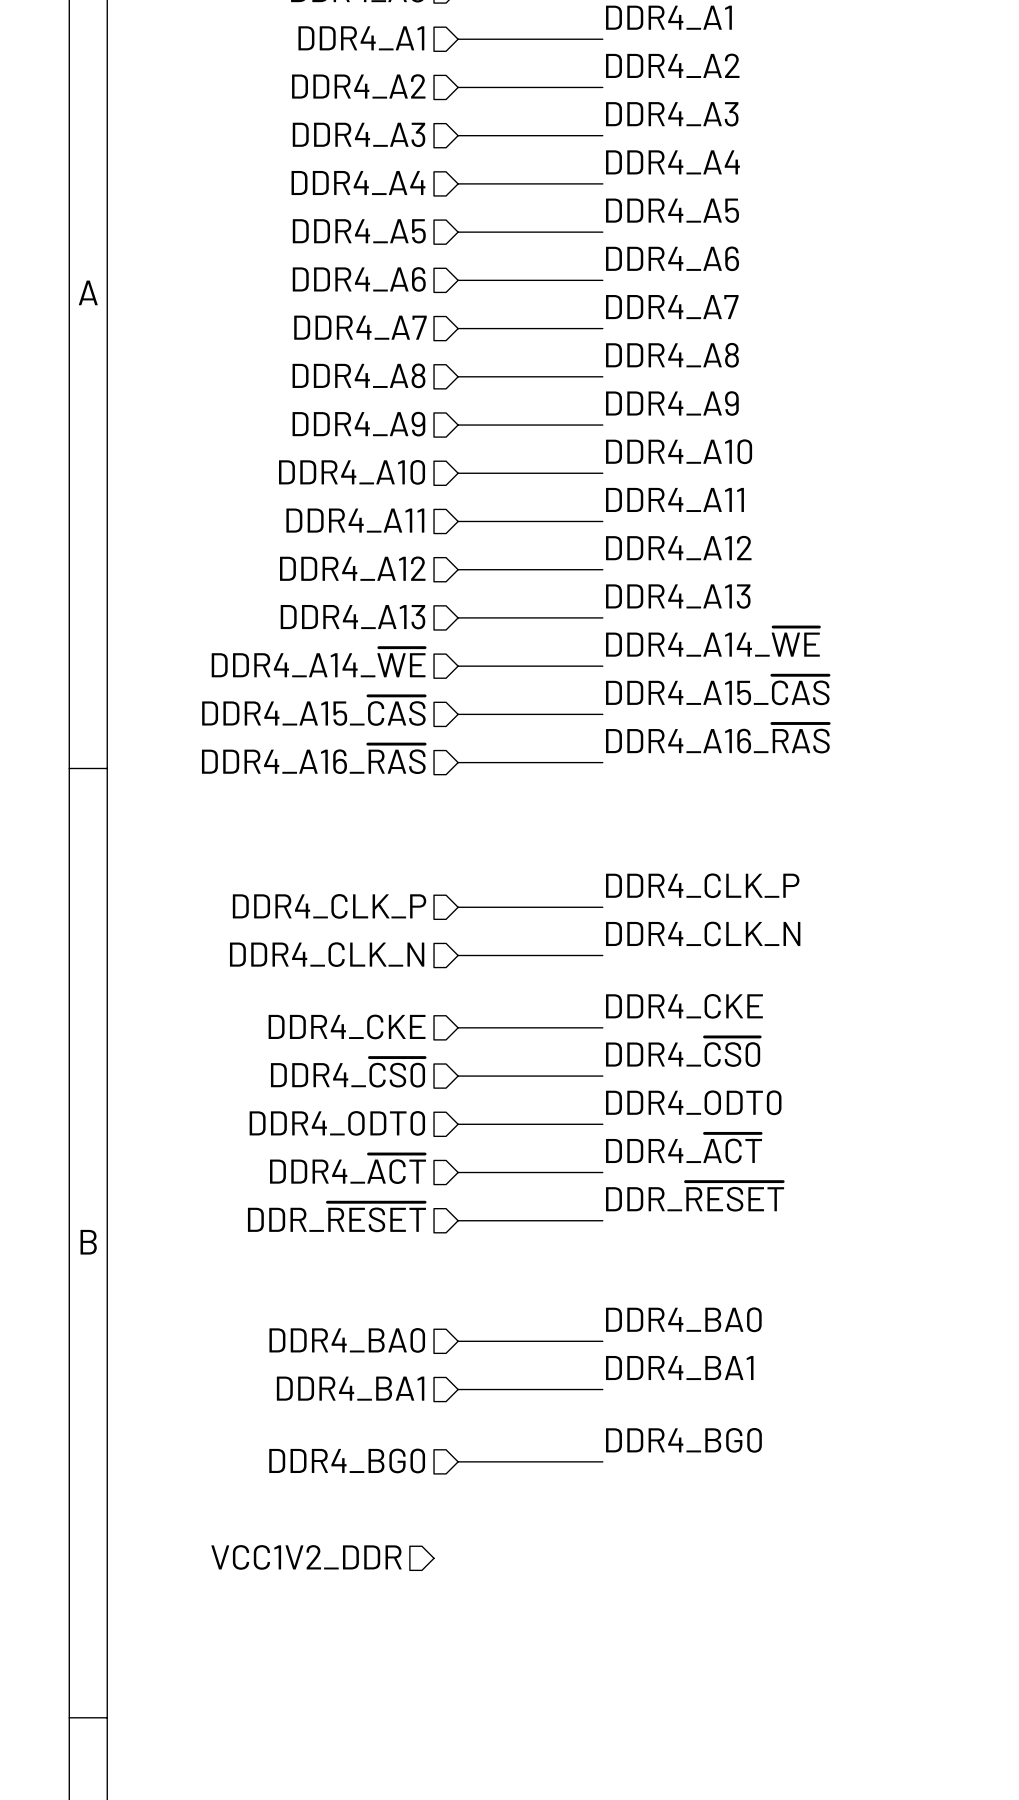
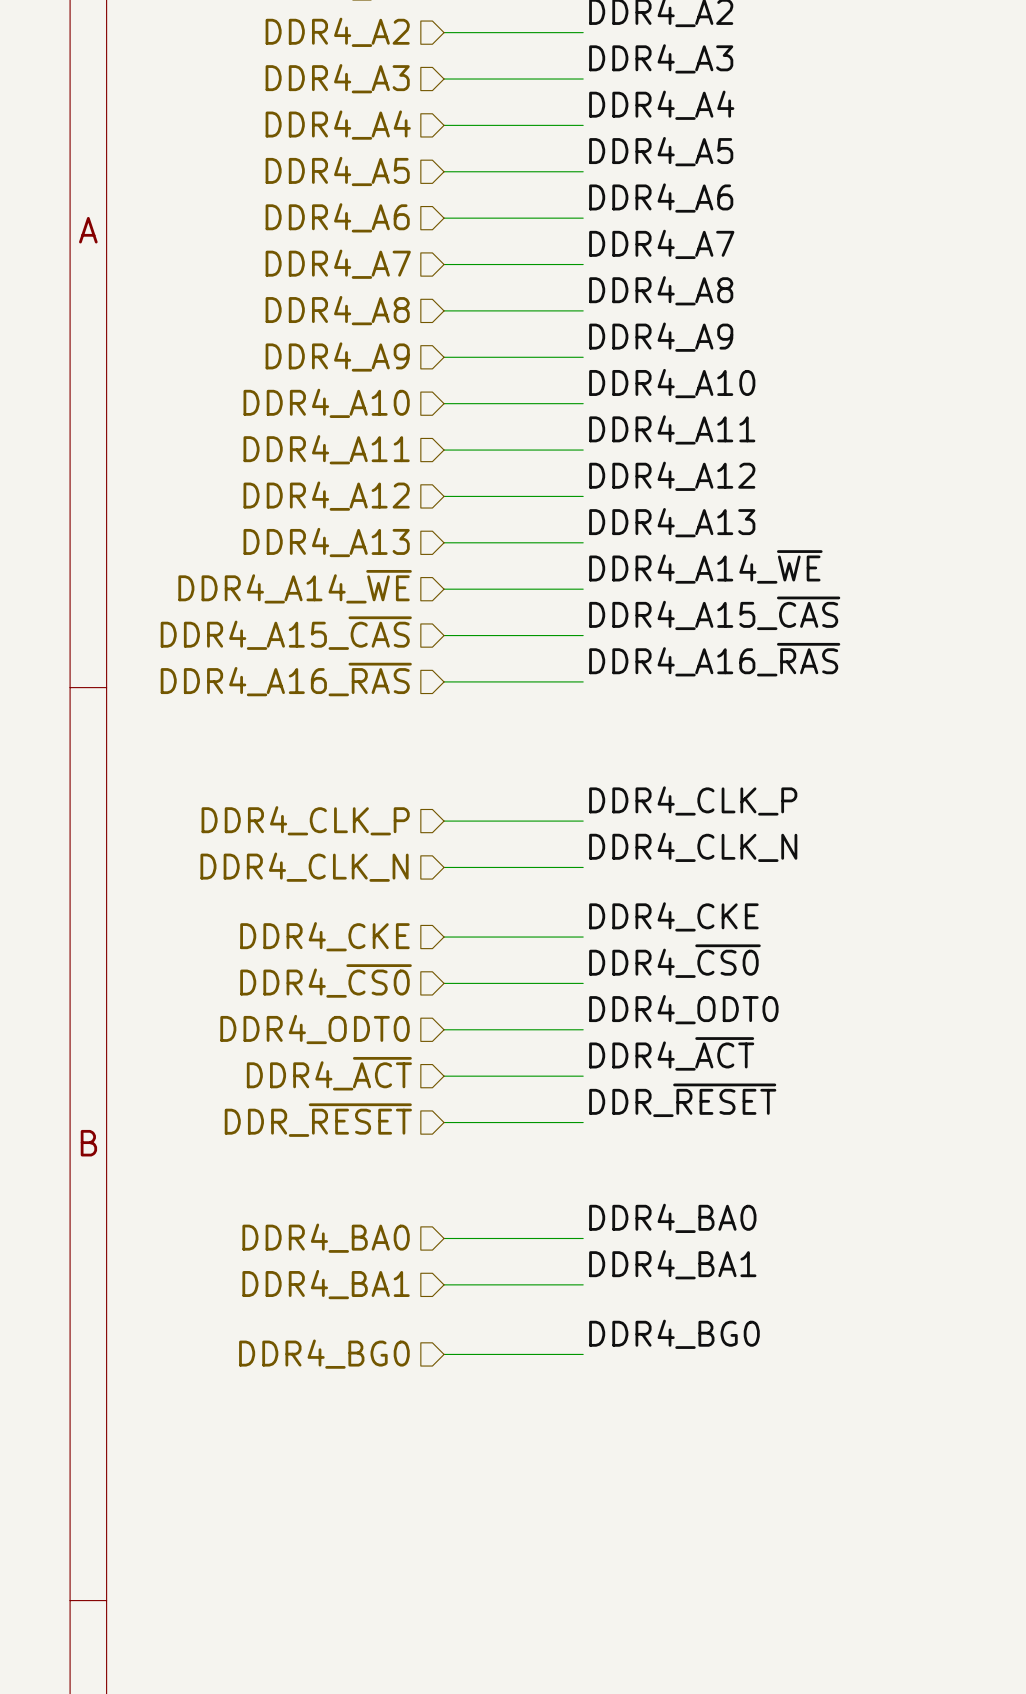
hierarchical label: VCC1V2_DDR (306, 1557) -> none

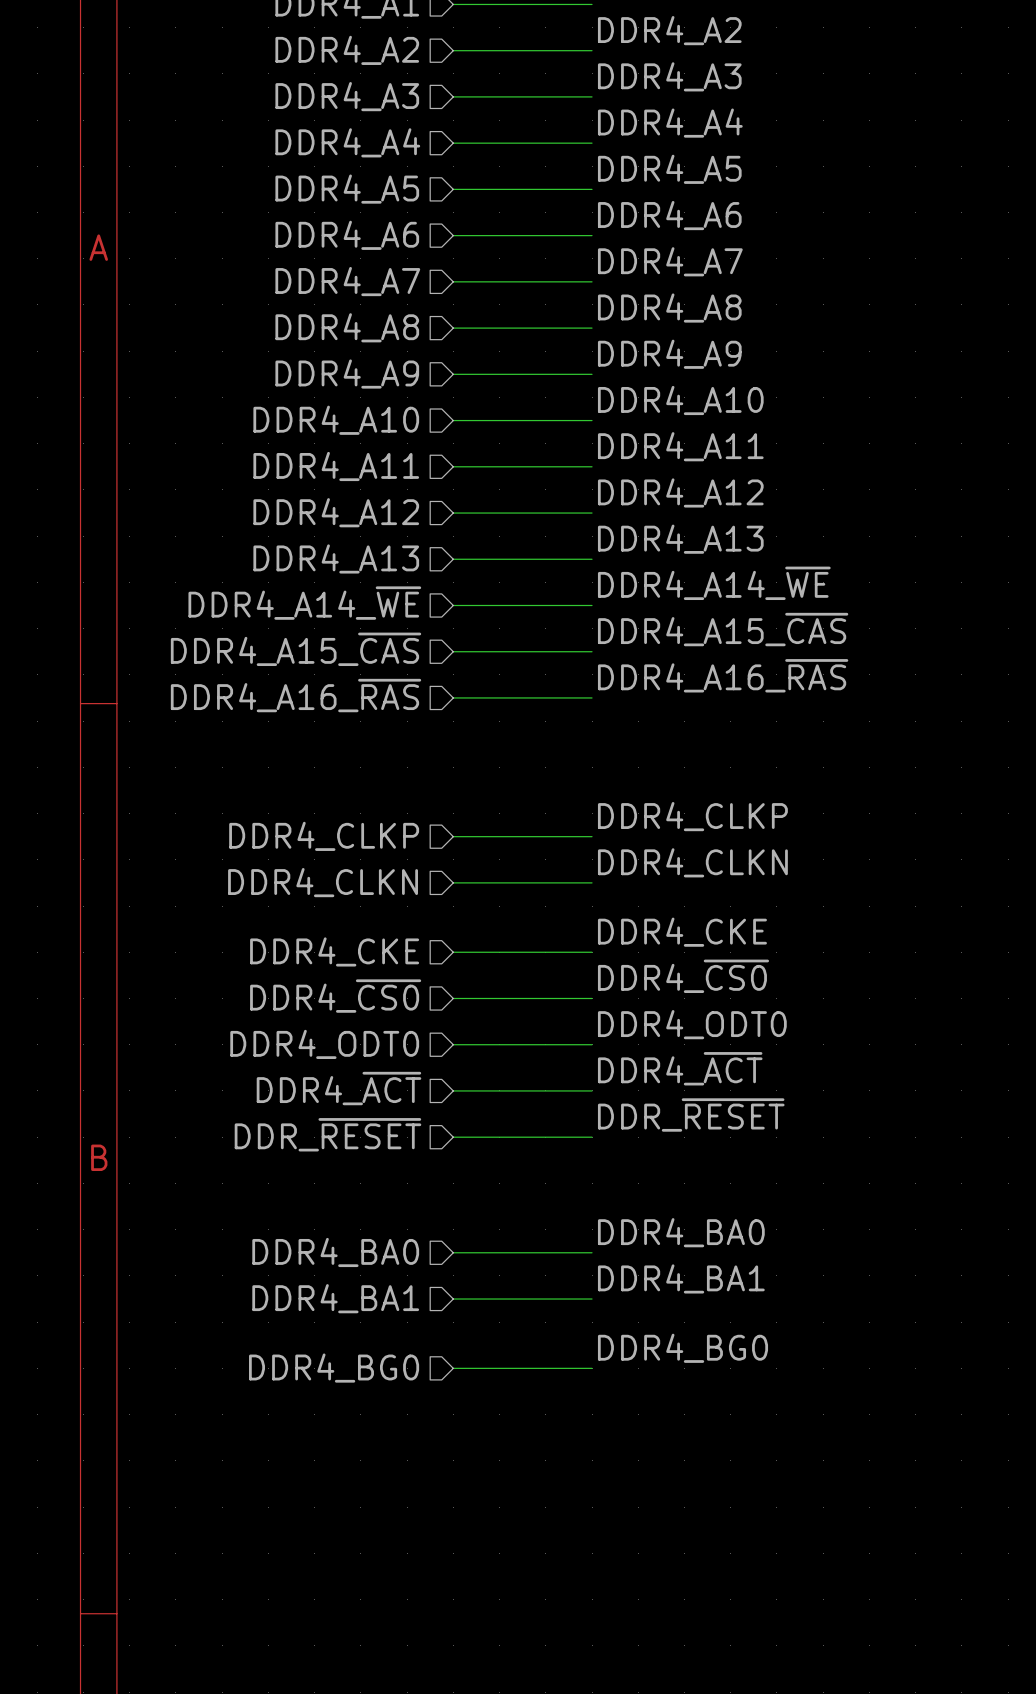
label: DDR4_CLK_P (693, 800) -> DDR4_CLKP (692, 816)
hierarchical label: DDR4_CLK_P (305, 820) -> DDR4_CLKP (324, 836)
label: DDR4_CLK_N (693, 847) -> DDR4_CLKN (692, 862)
hierarchical label: DDR4_CLK_N (304, 867) -> DDR4_CLKN (323, 882)

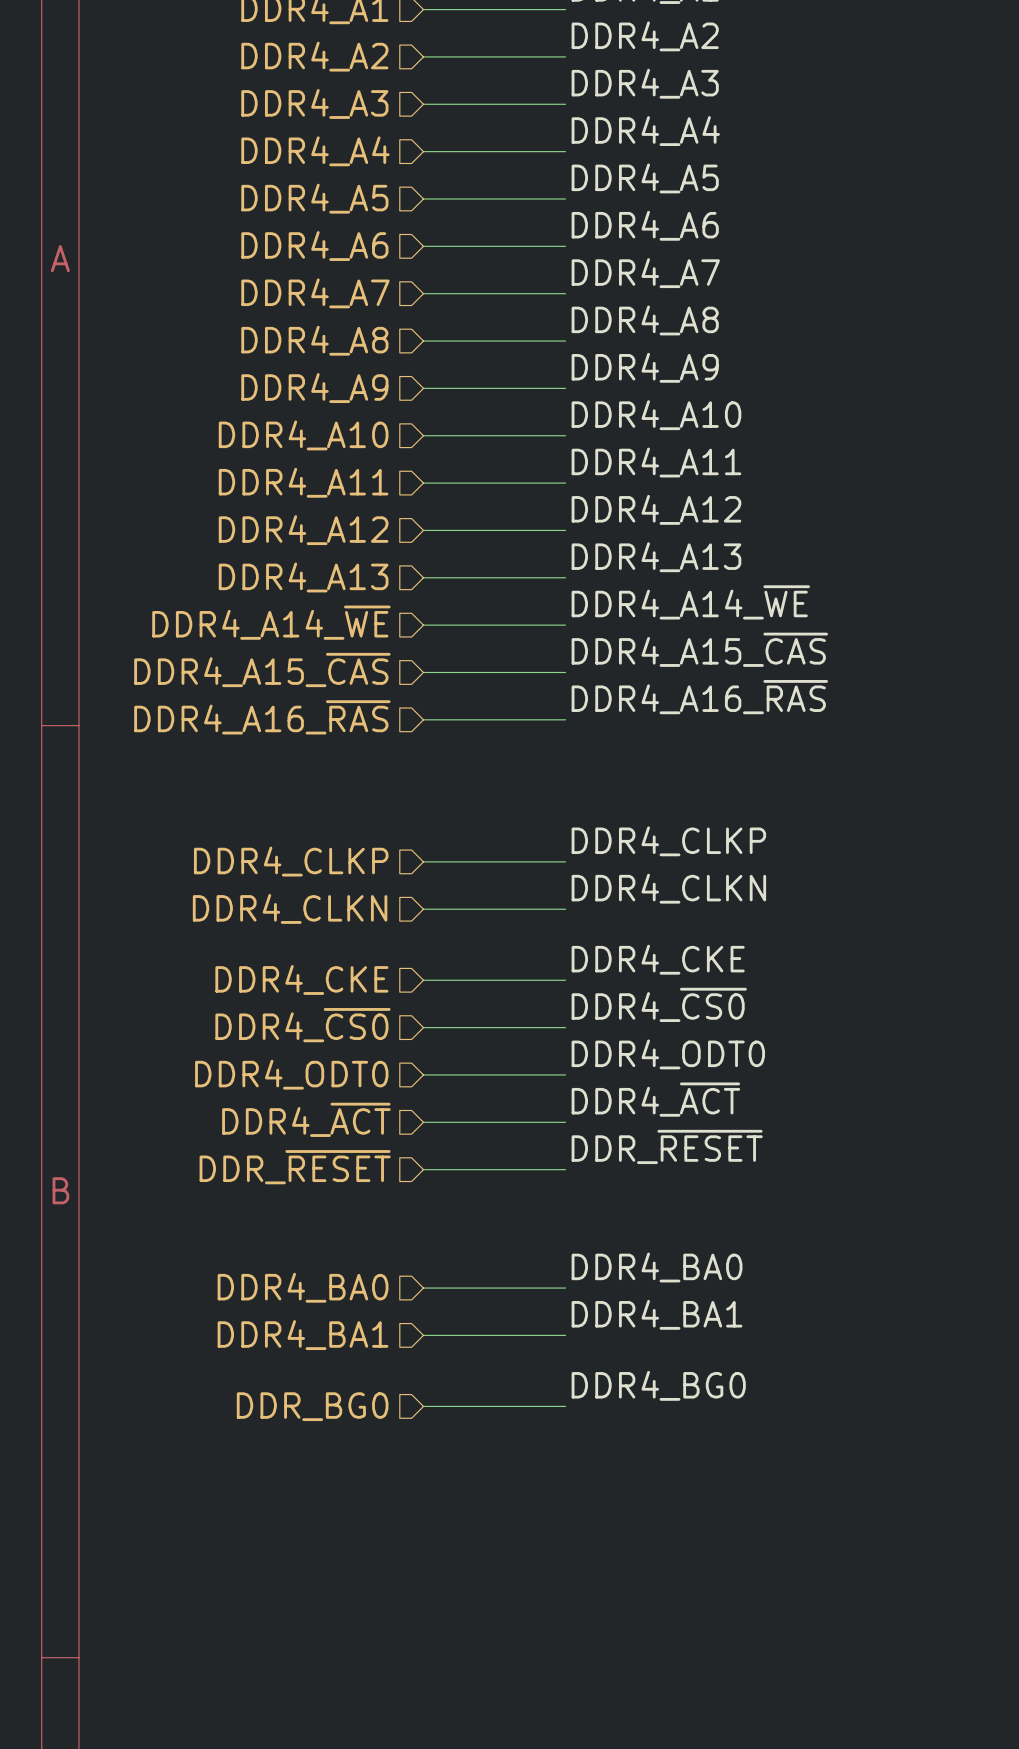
hierarchical label: DDR4_BG0 (334, 1368) -> DDR_BG0 (312, 1406)

